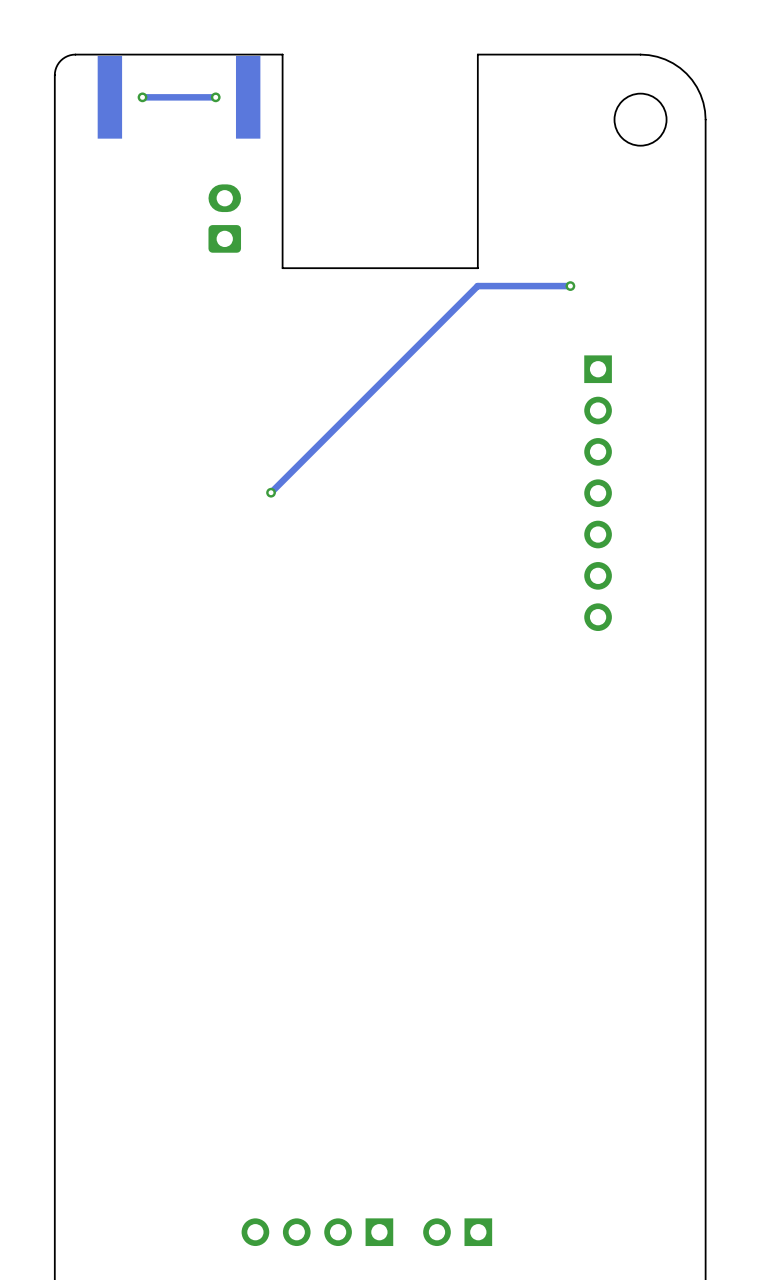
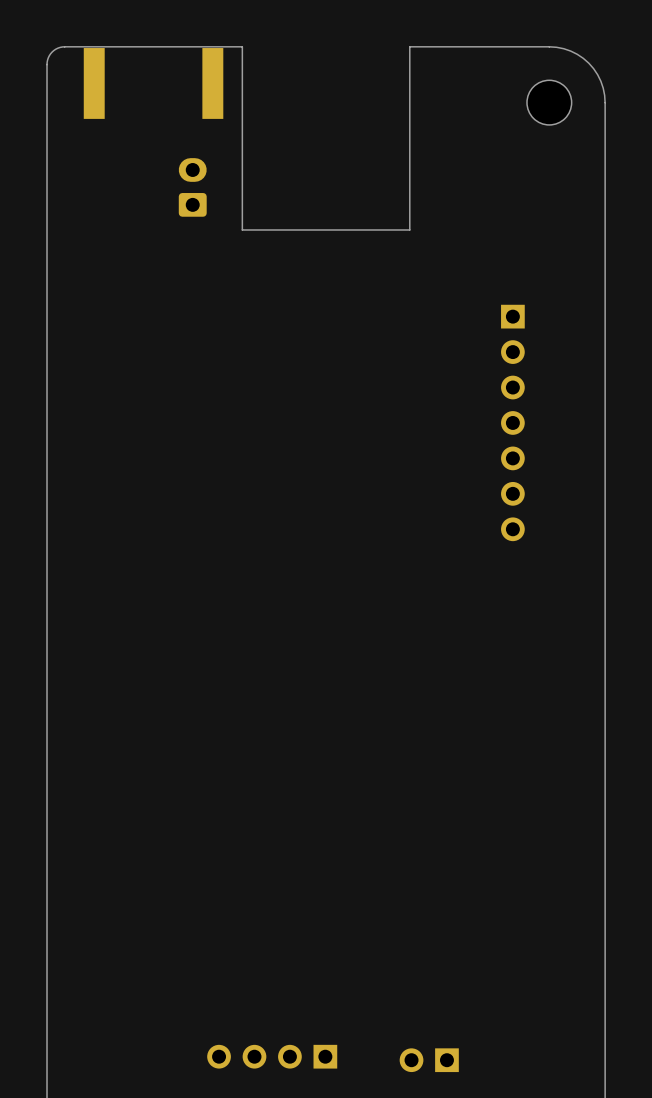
via: (142, 97) -> none
track: (215, 97) (142, 97) -> none
via: (215, 97) -> none
track: (570, 286) (477, 286) (271, 492) -> none
via: (570, 286) -> none
via: (271, 492) -> none
part position: (457, 1232) -> (429, 1060)

